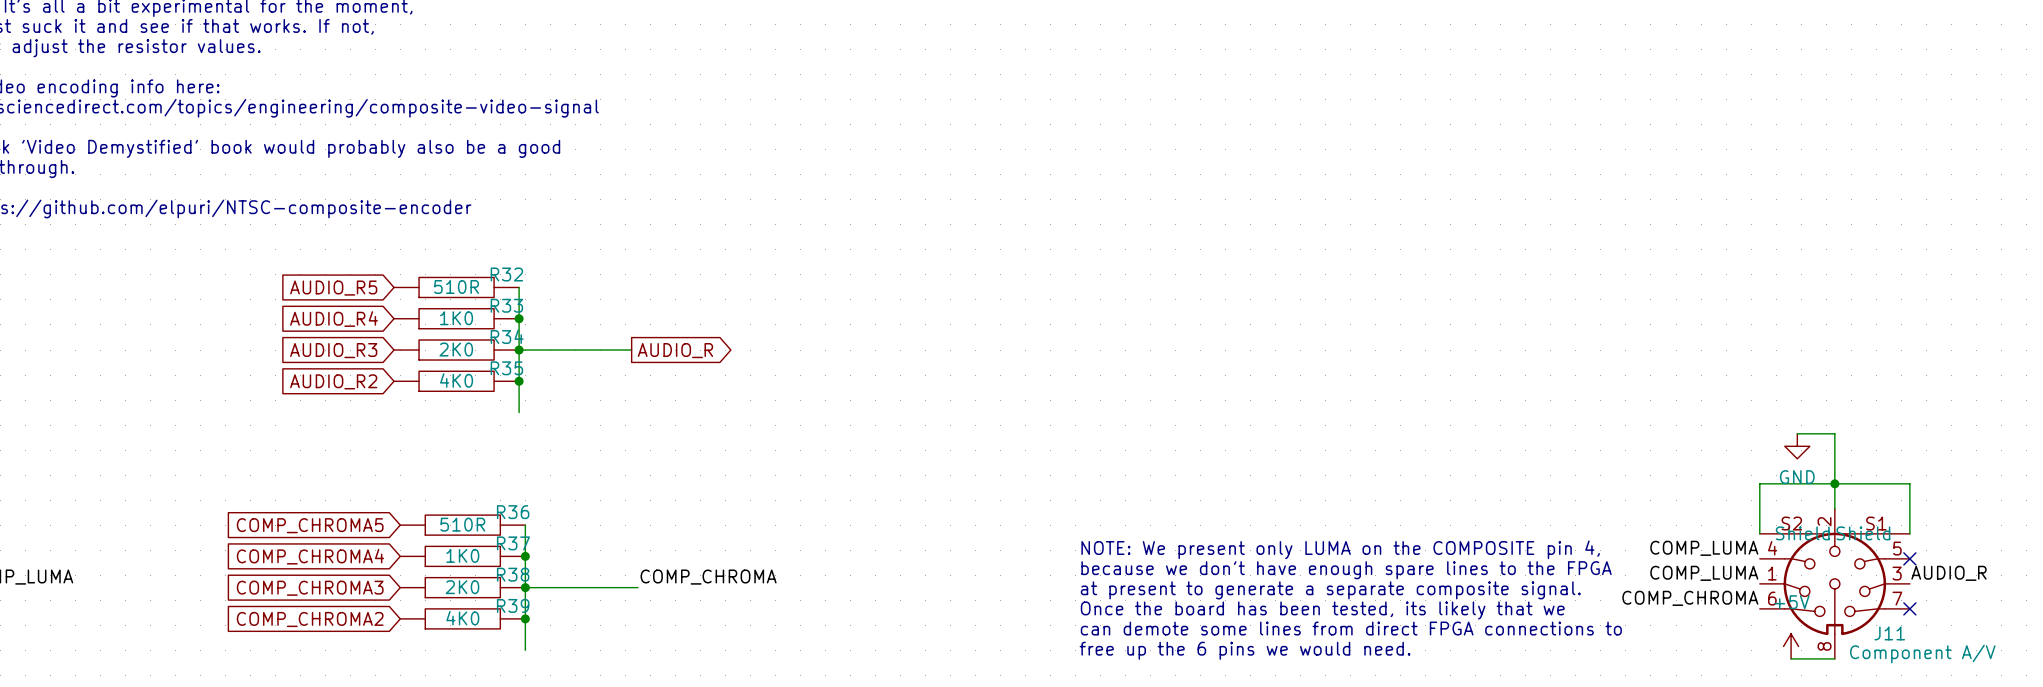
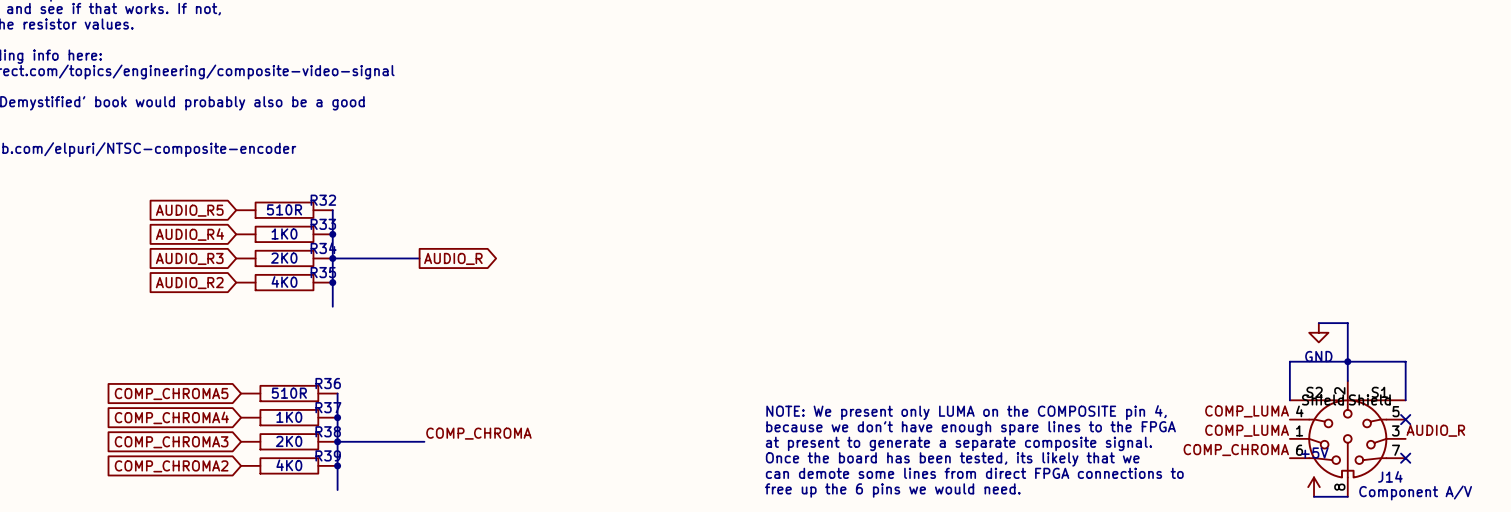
J11 name: J11 (1889, 633) -> J14 (1390, 476)

